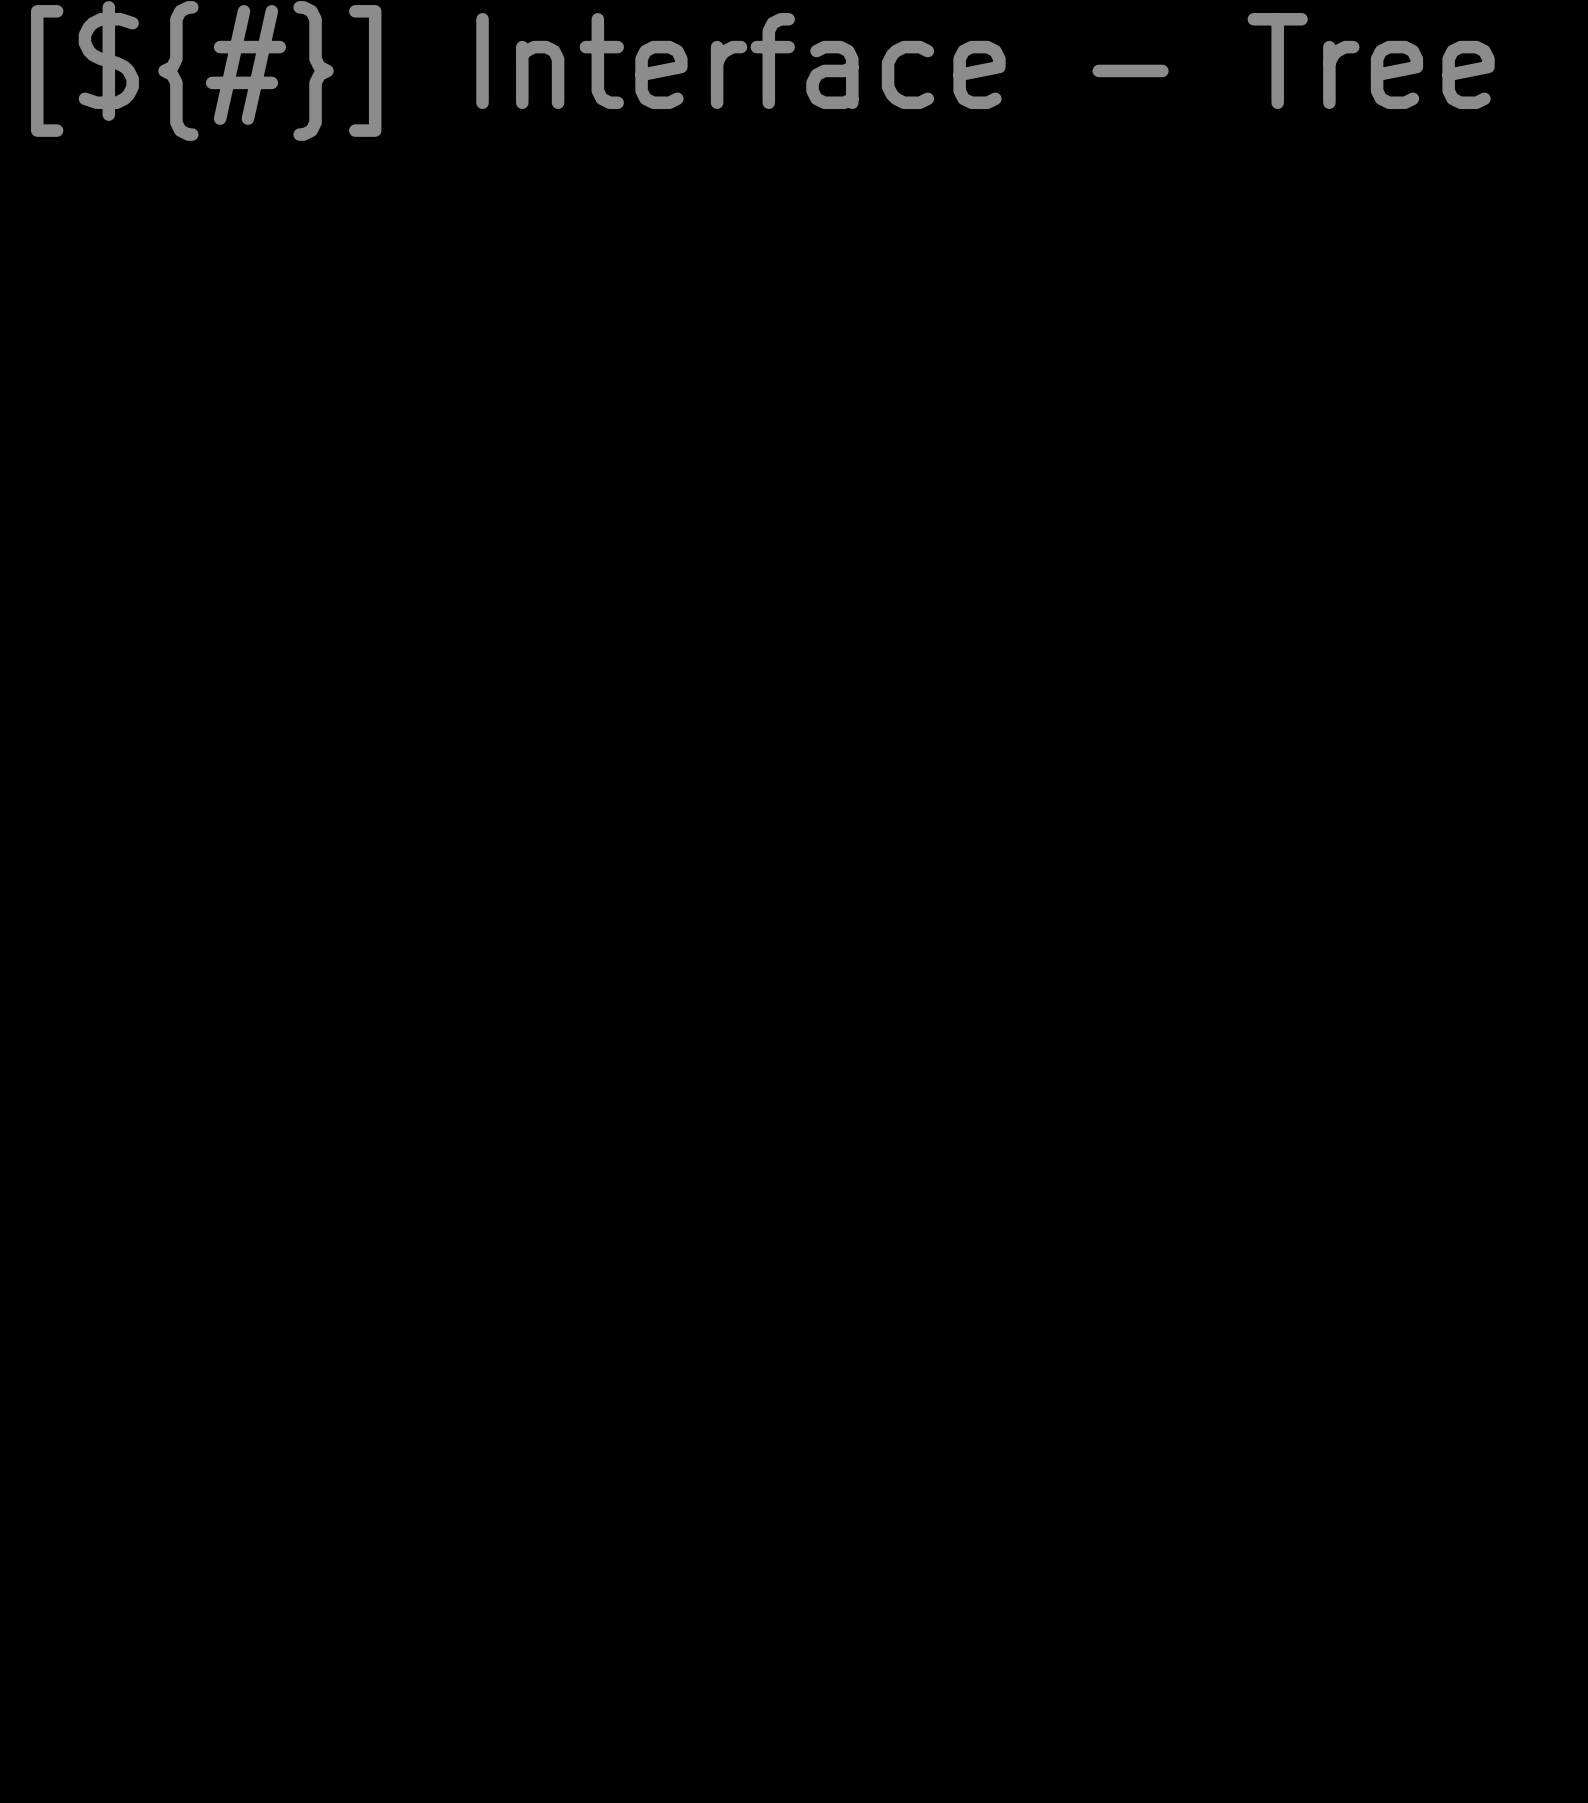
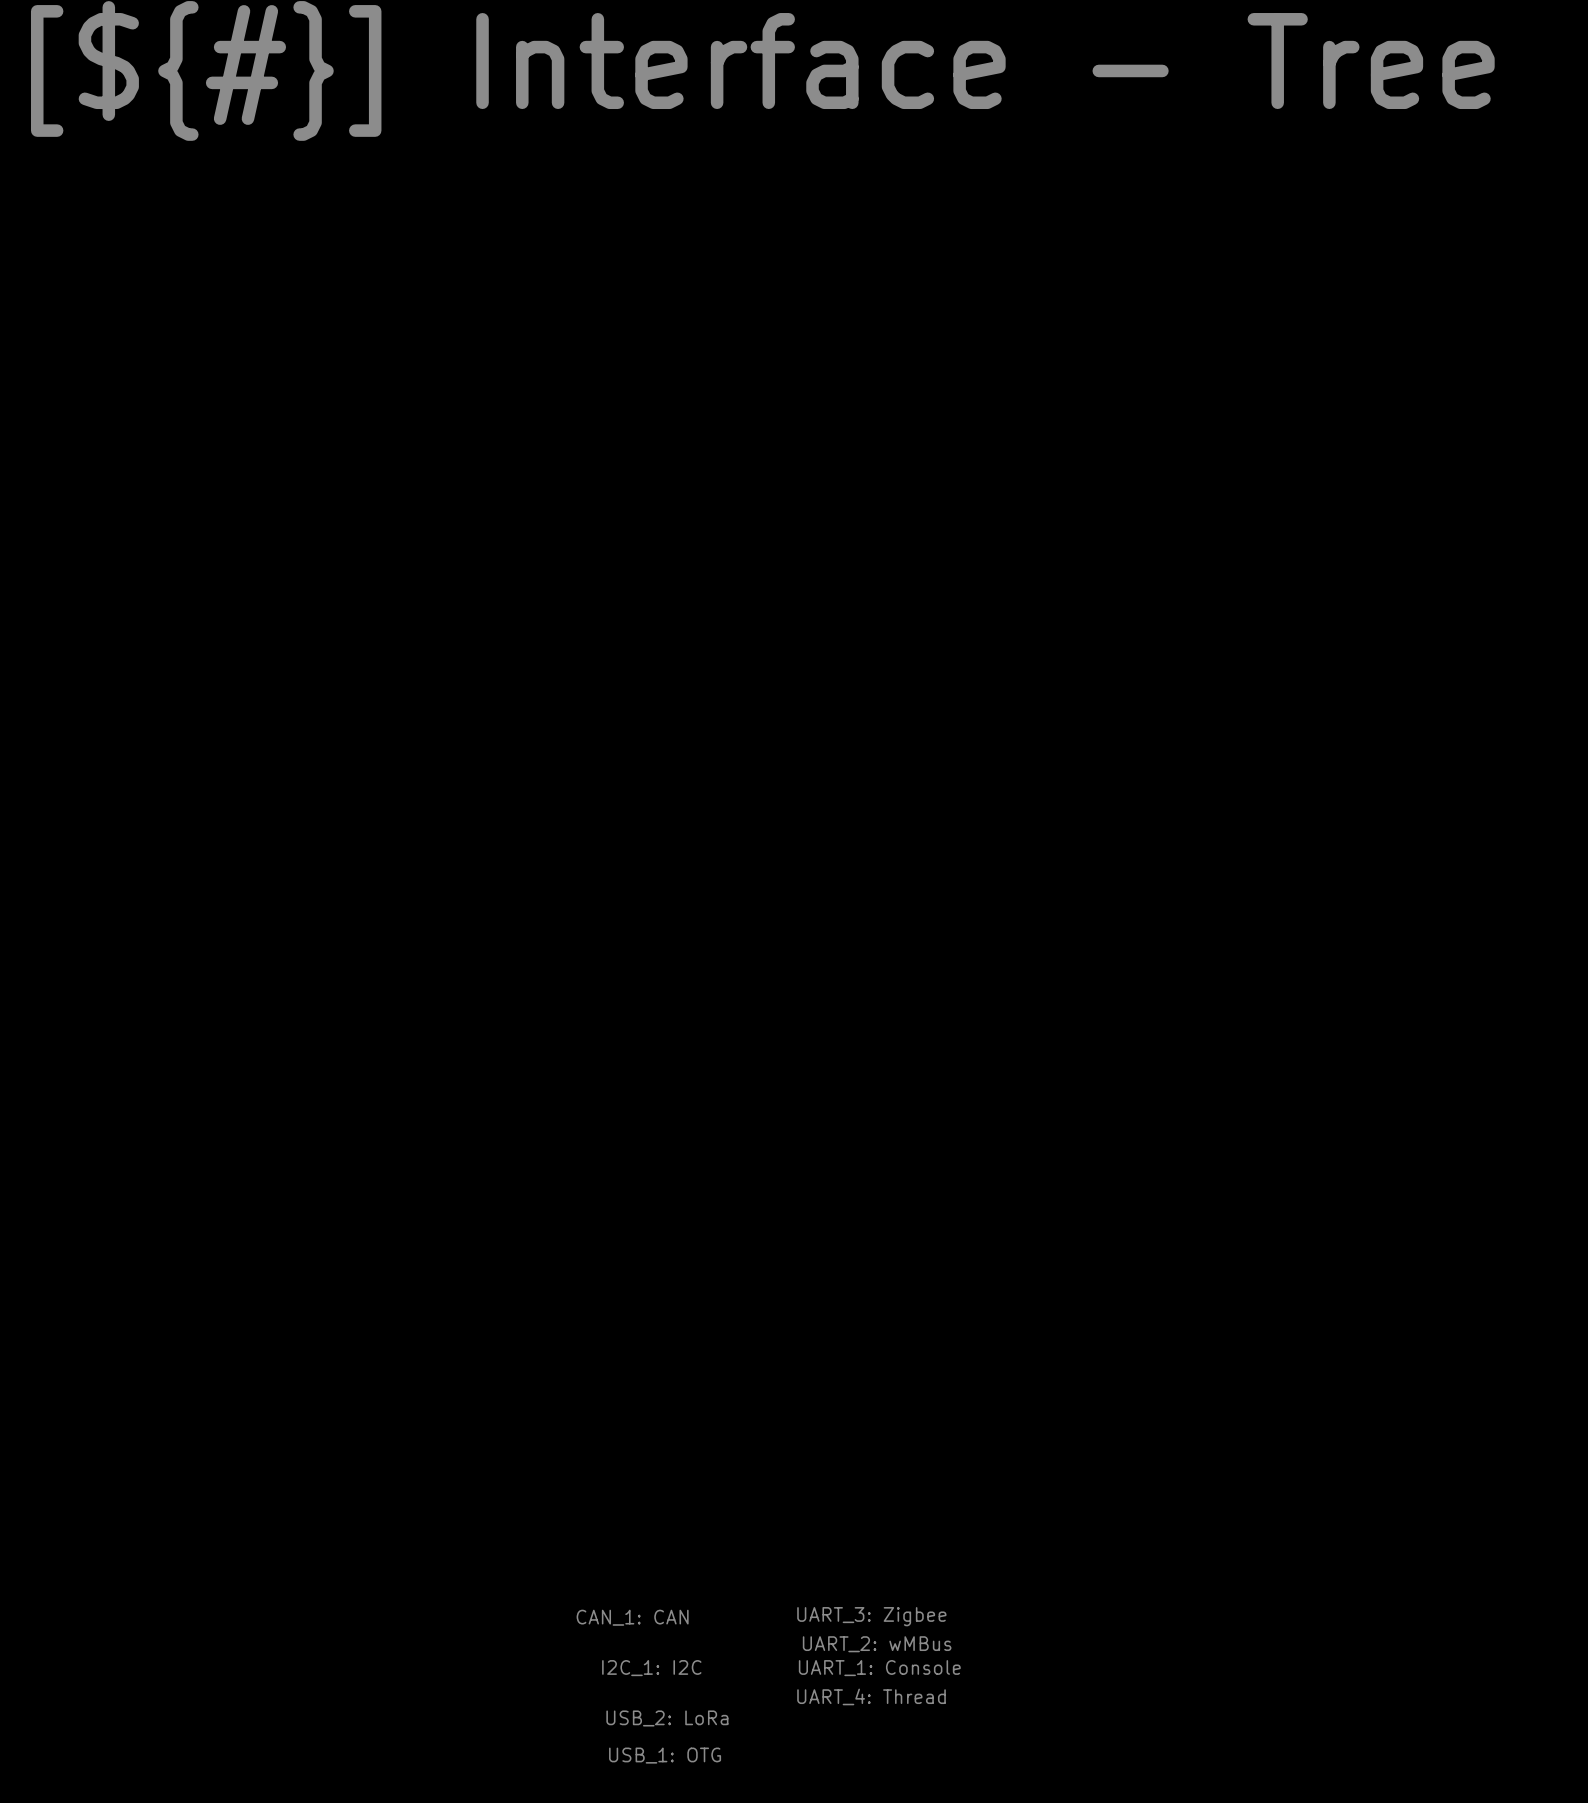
text: none -> UART_3: Zigbee (871, 1616)
text: none -> CAN_1: CAN (632, 1617)
text: none -> UART_2: wMBus (877, 1644)
text: none -> I2C_1: I2C (651, 1668)
text: none -> UART_1: Console (879, 1668)
text: none -> UART_4: Thread (871, 1696)
text: none -> USB_2: LoRa (667, 1718)
text: none -> USB_1: OTG (665, 1755)

